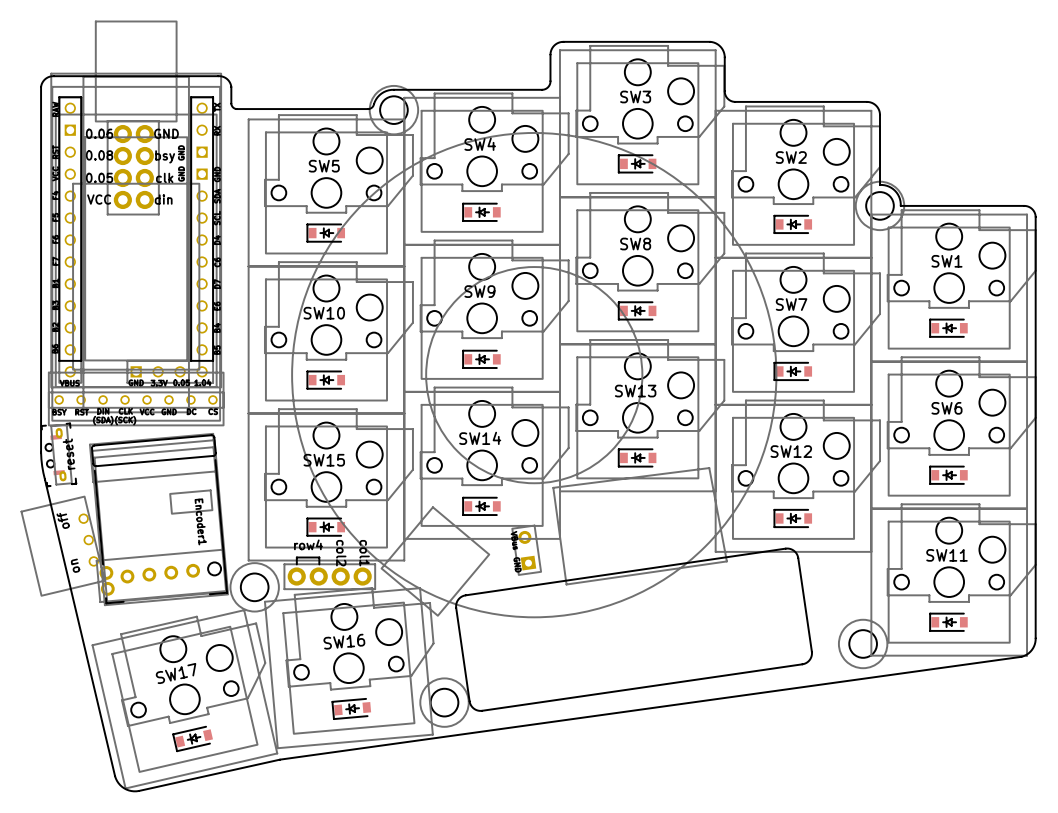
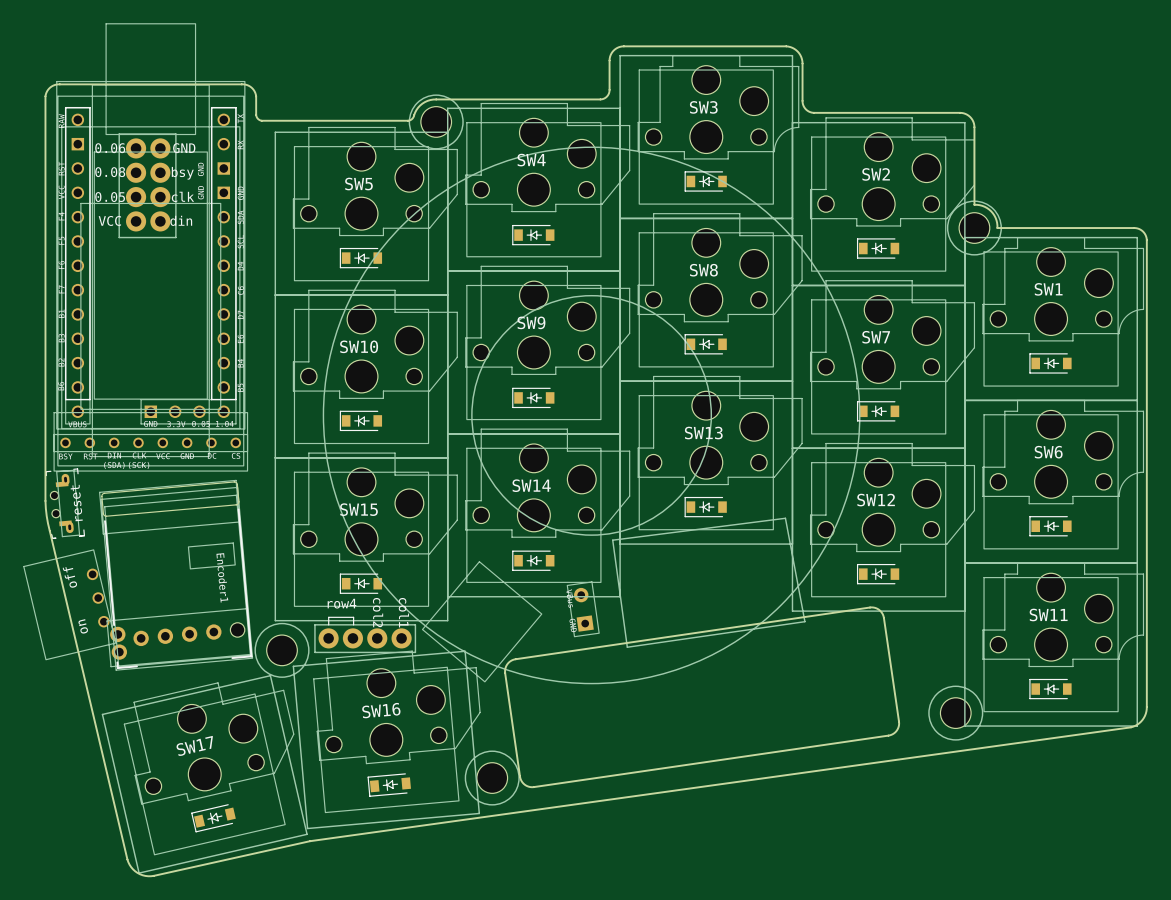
SW3 footprint: [559, 45, 725, 198] -> [619, 54, 800, 220]
SW1 footprint: [870, 209, 1037, 363] -> [964, 236, 1145, 402]
SW6 footprint: [870, 356, 1037, 510] -> [964, 399, 1145, 564]
SW11 footprint: [870, 503, 1037, 657] -> [964, 562, 1145, 727]

